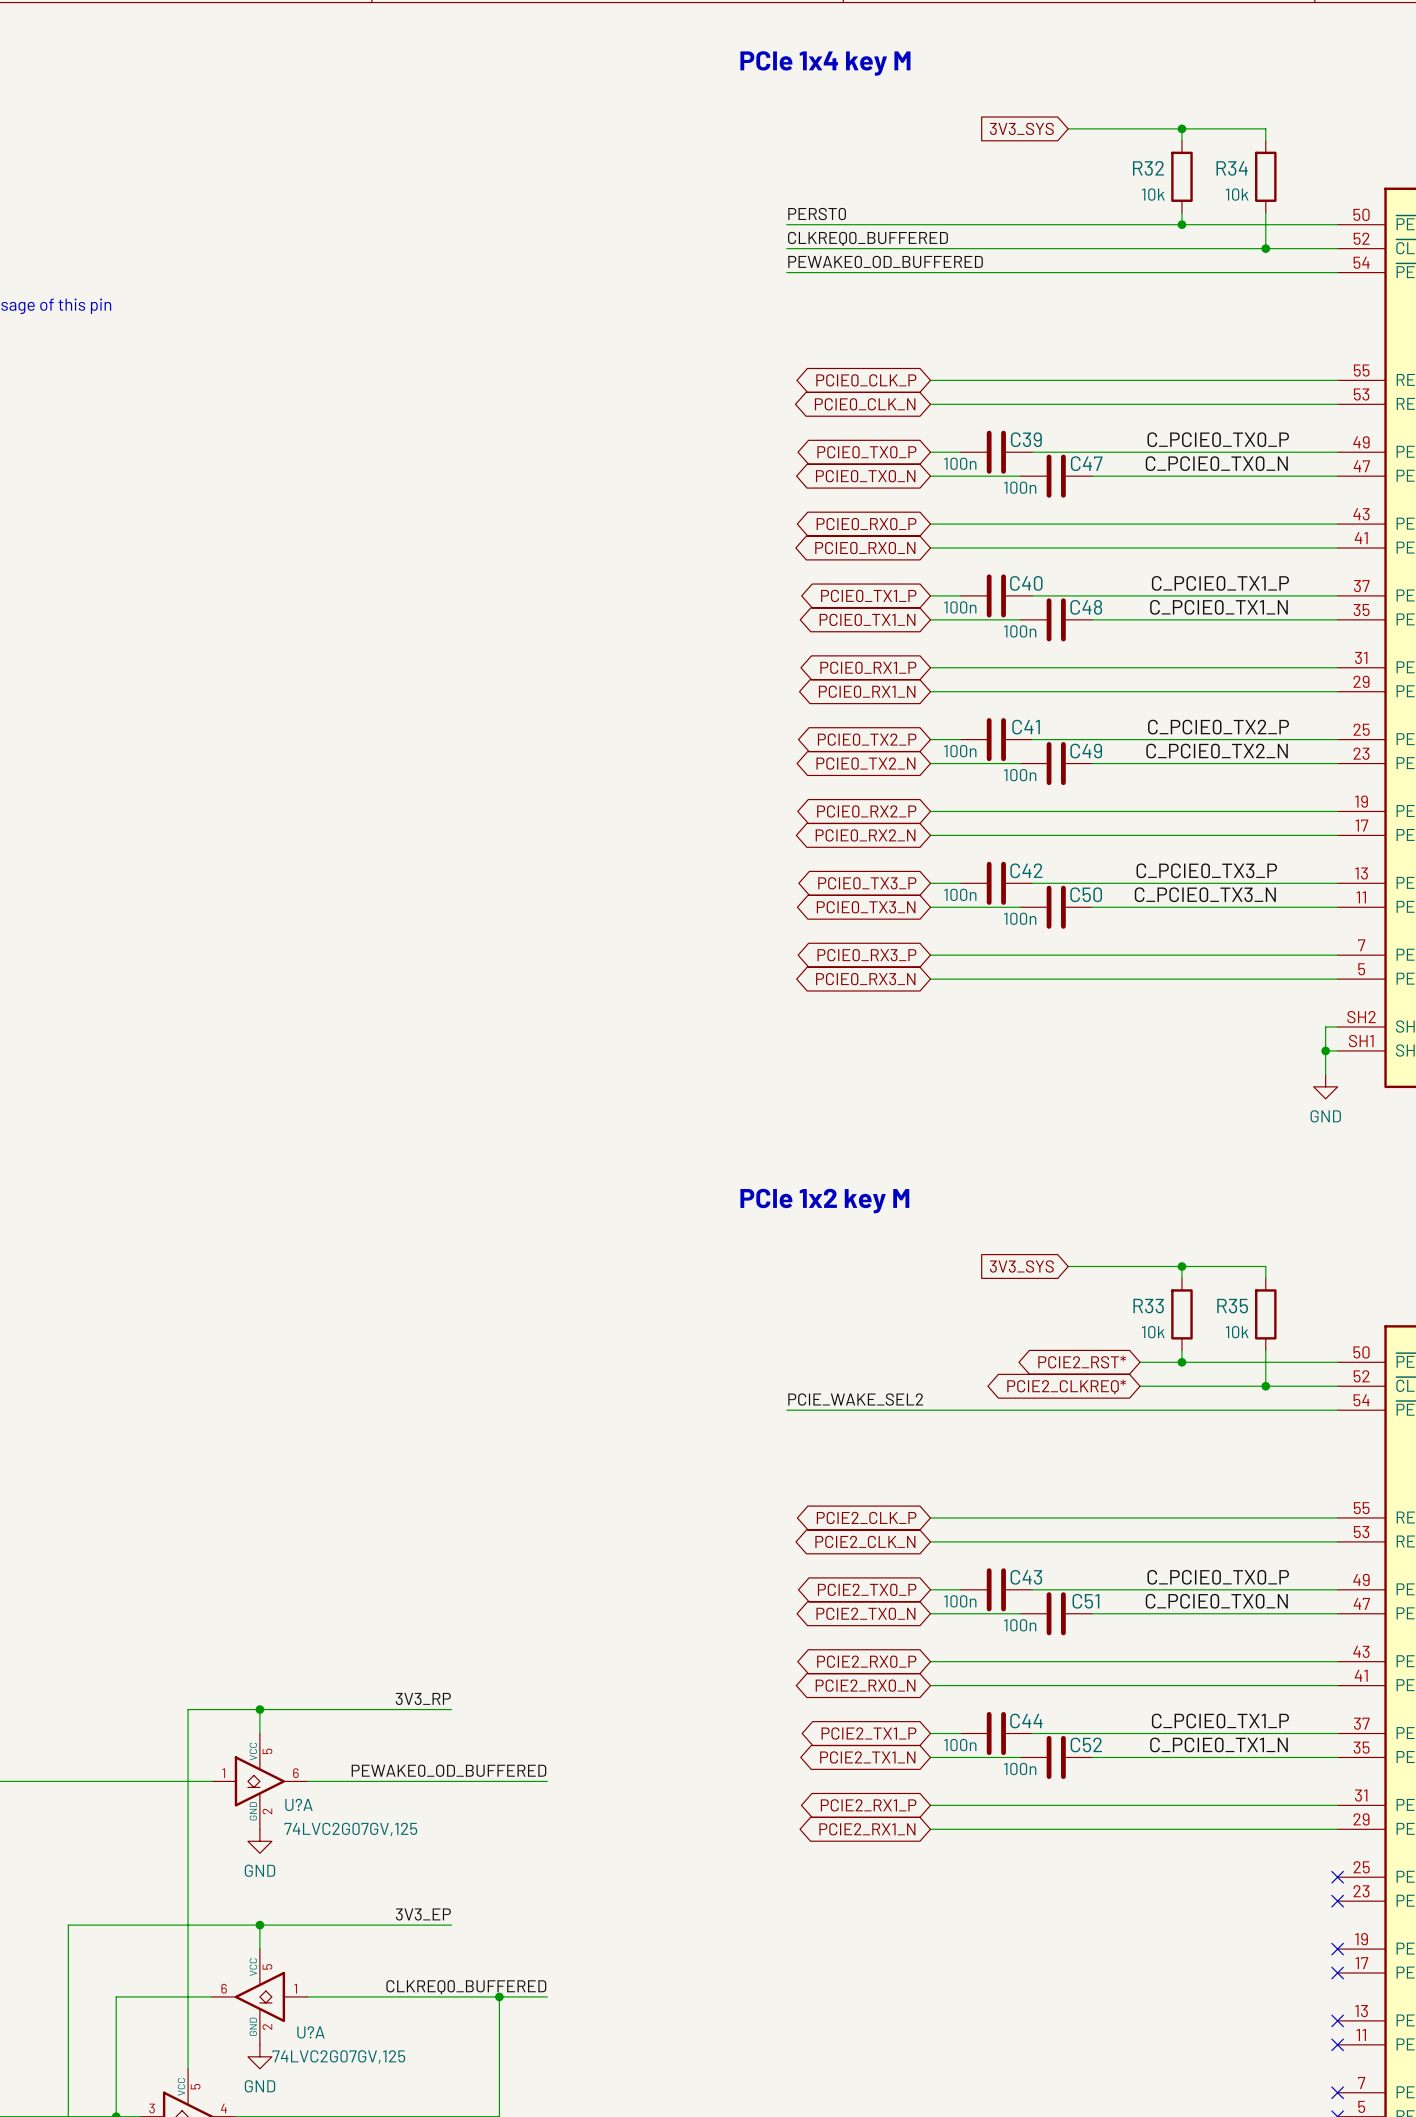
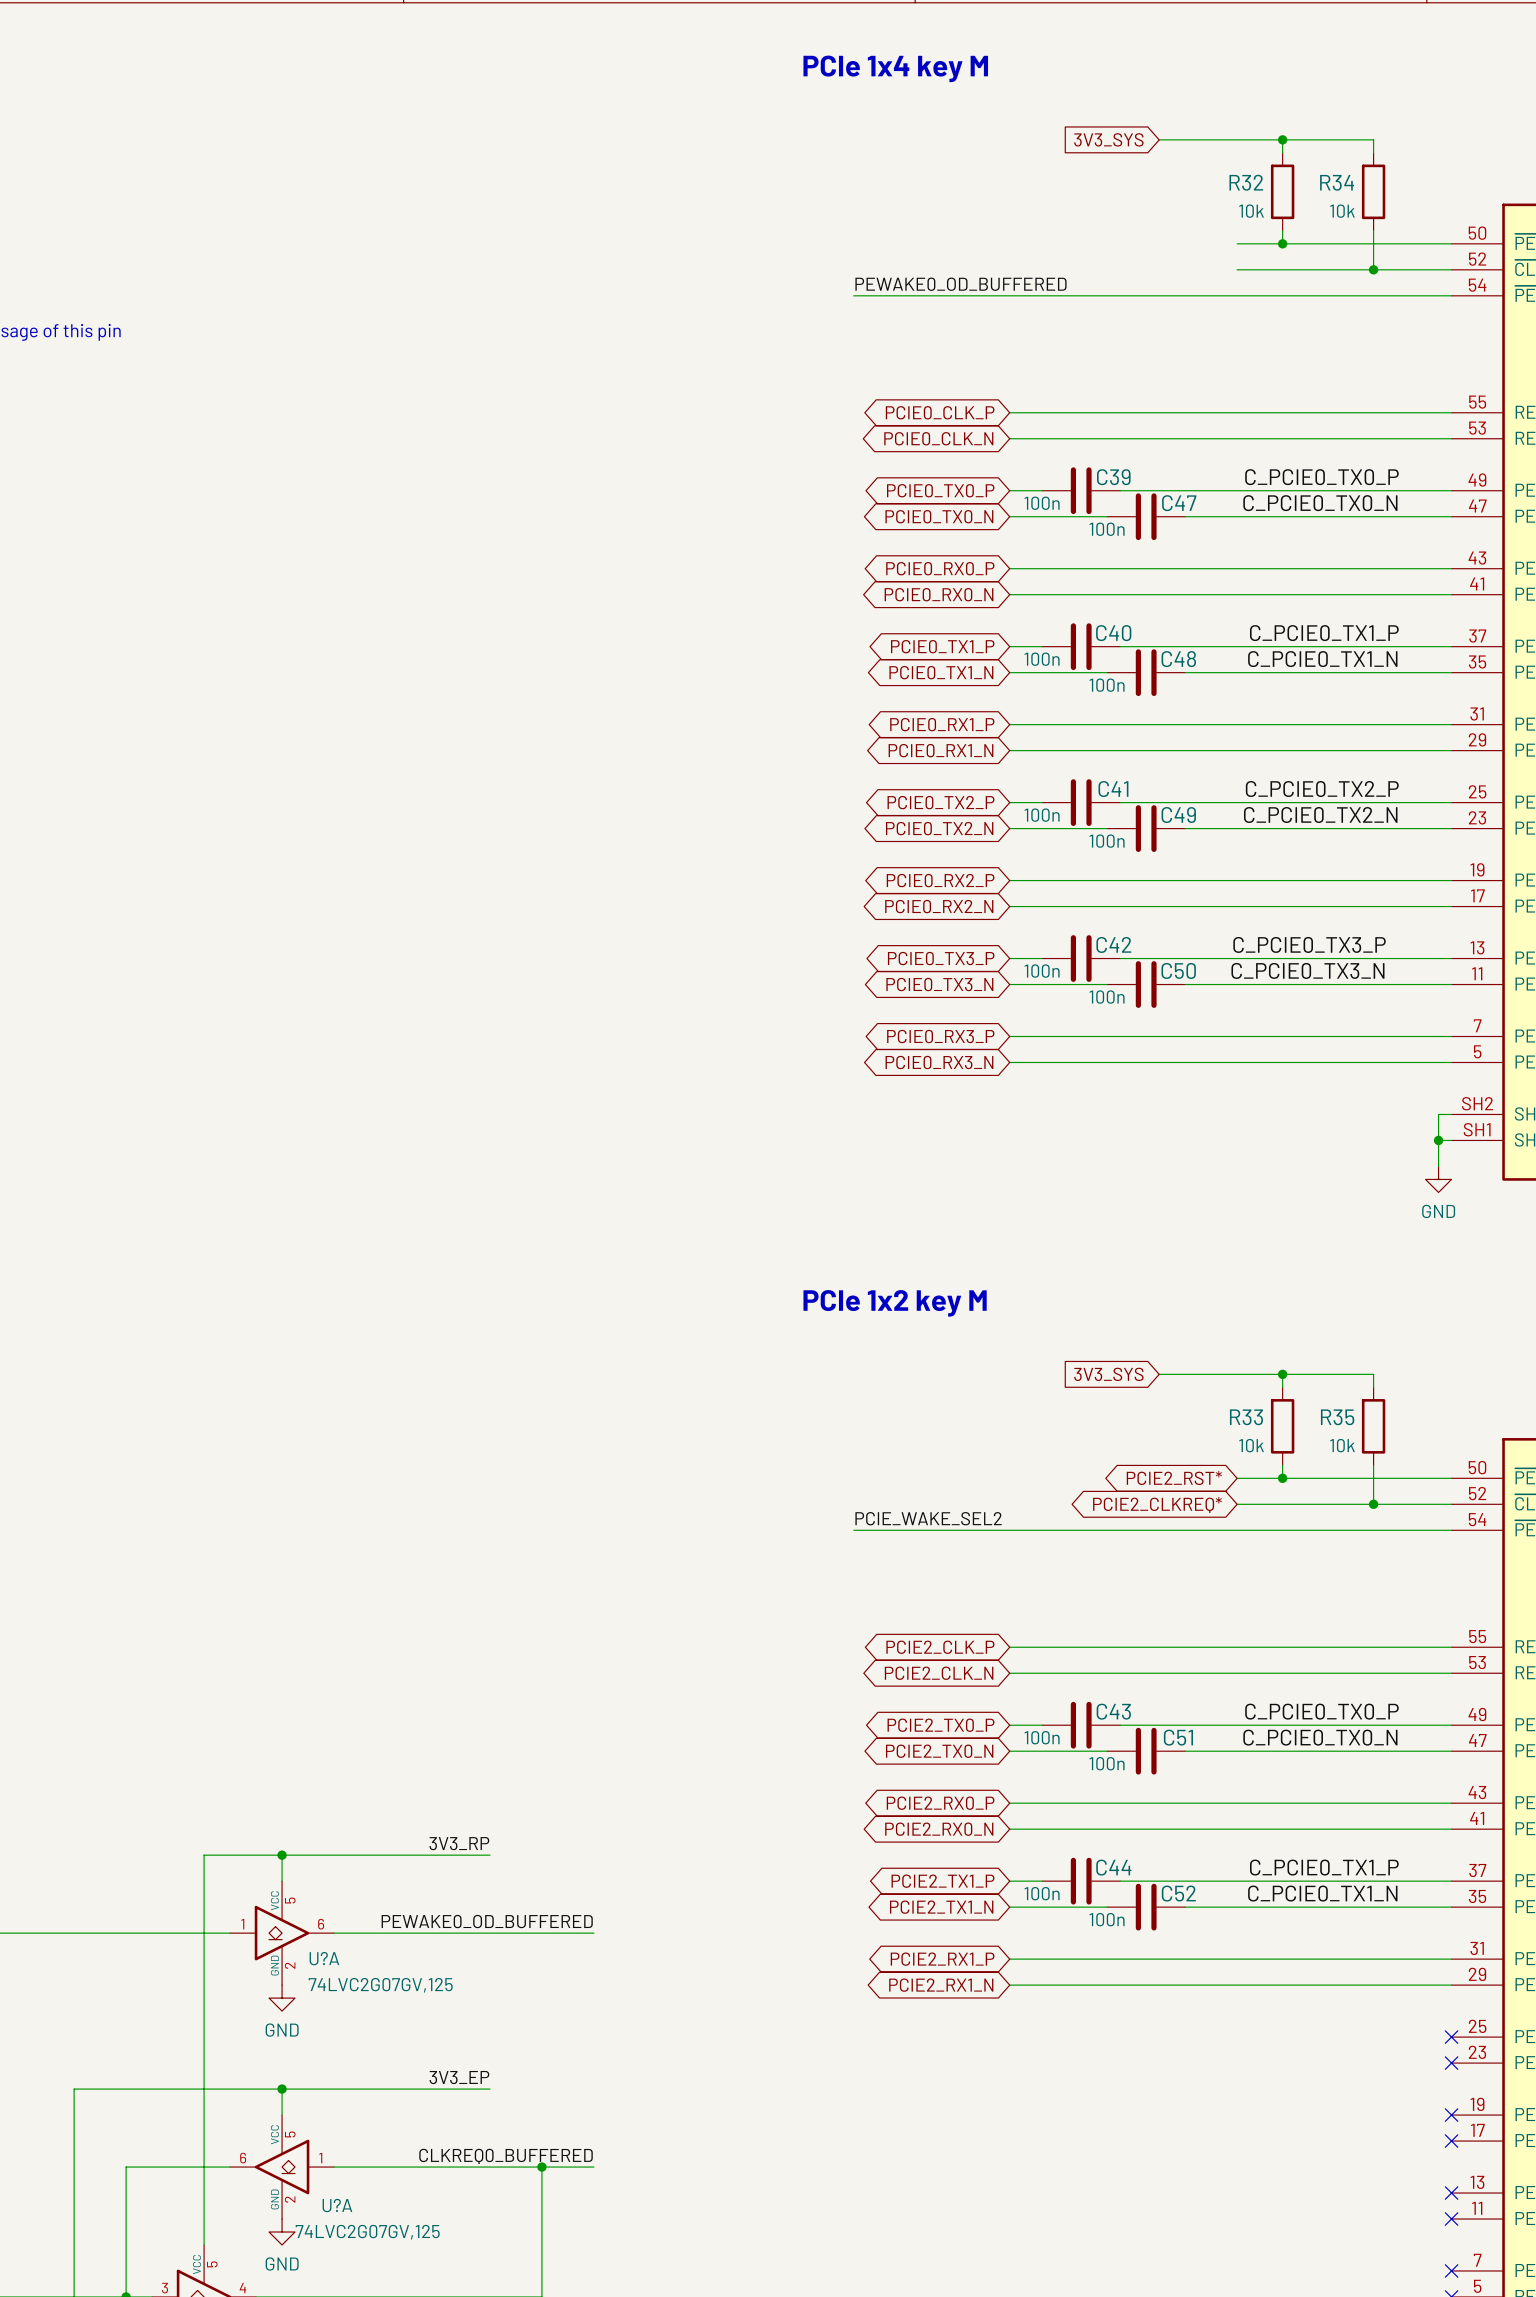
label: PERST0 (817, 214) -> none
wire: (786, 224) (1140, 224) -> none
label: CLKREQ0_BUFFERED (867, 238) -> none
wire: (786, 248) (1140, 248) -> none

